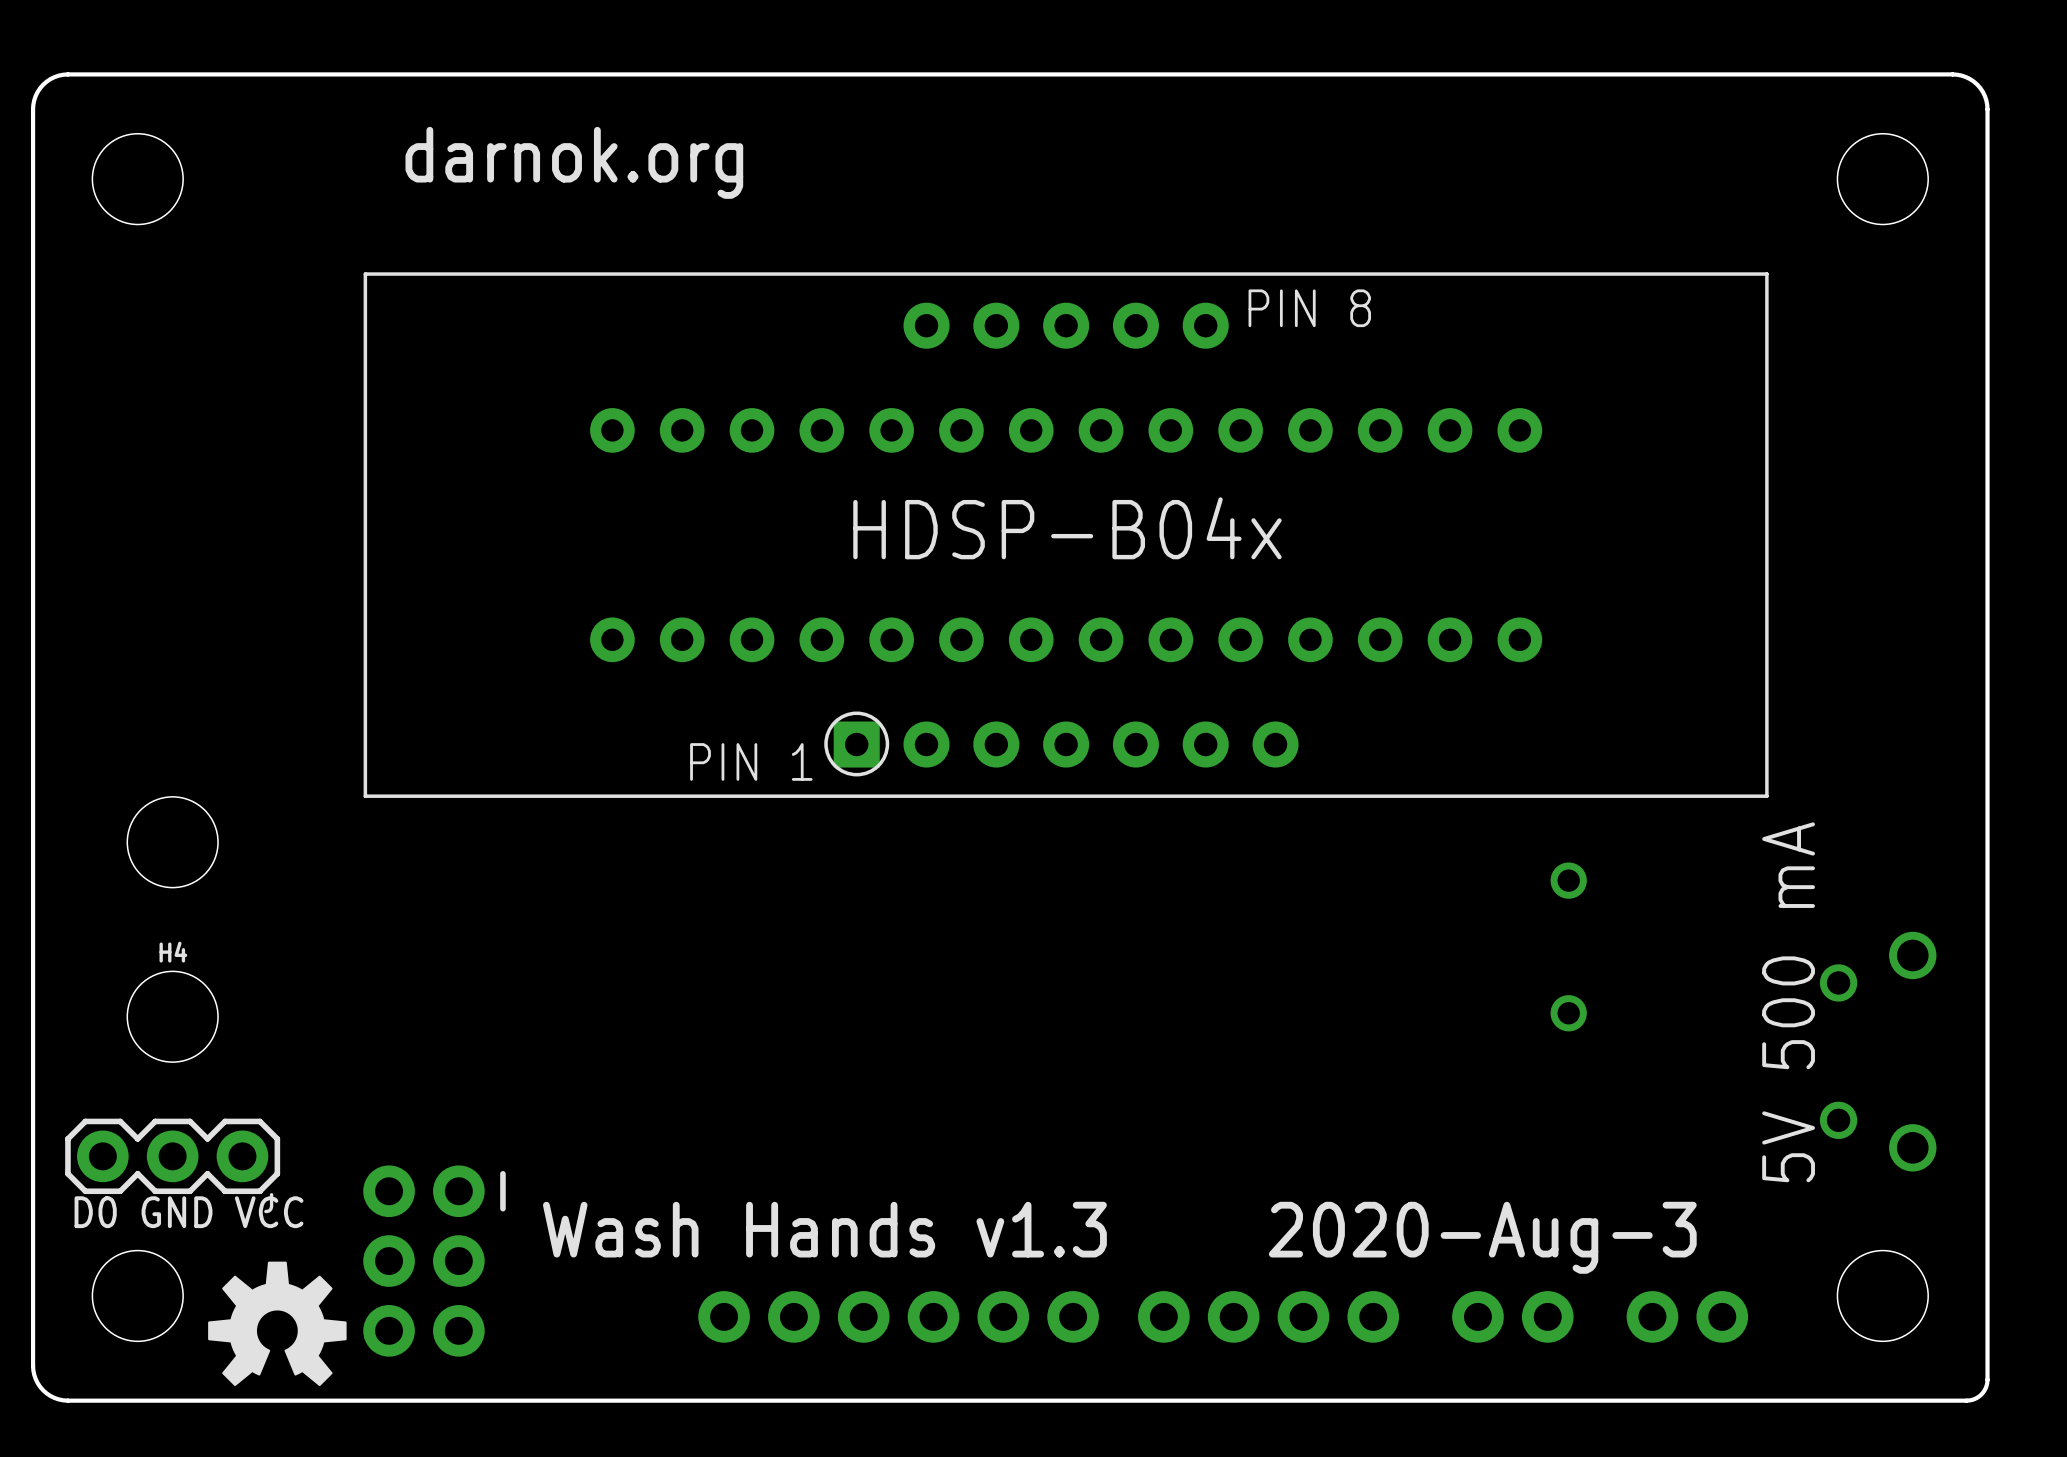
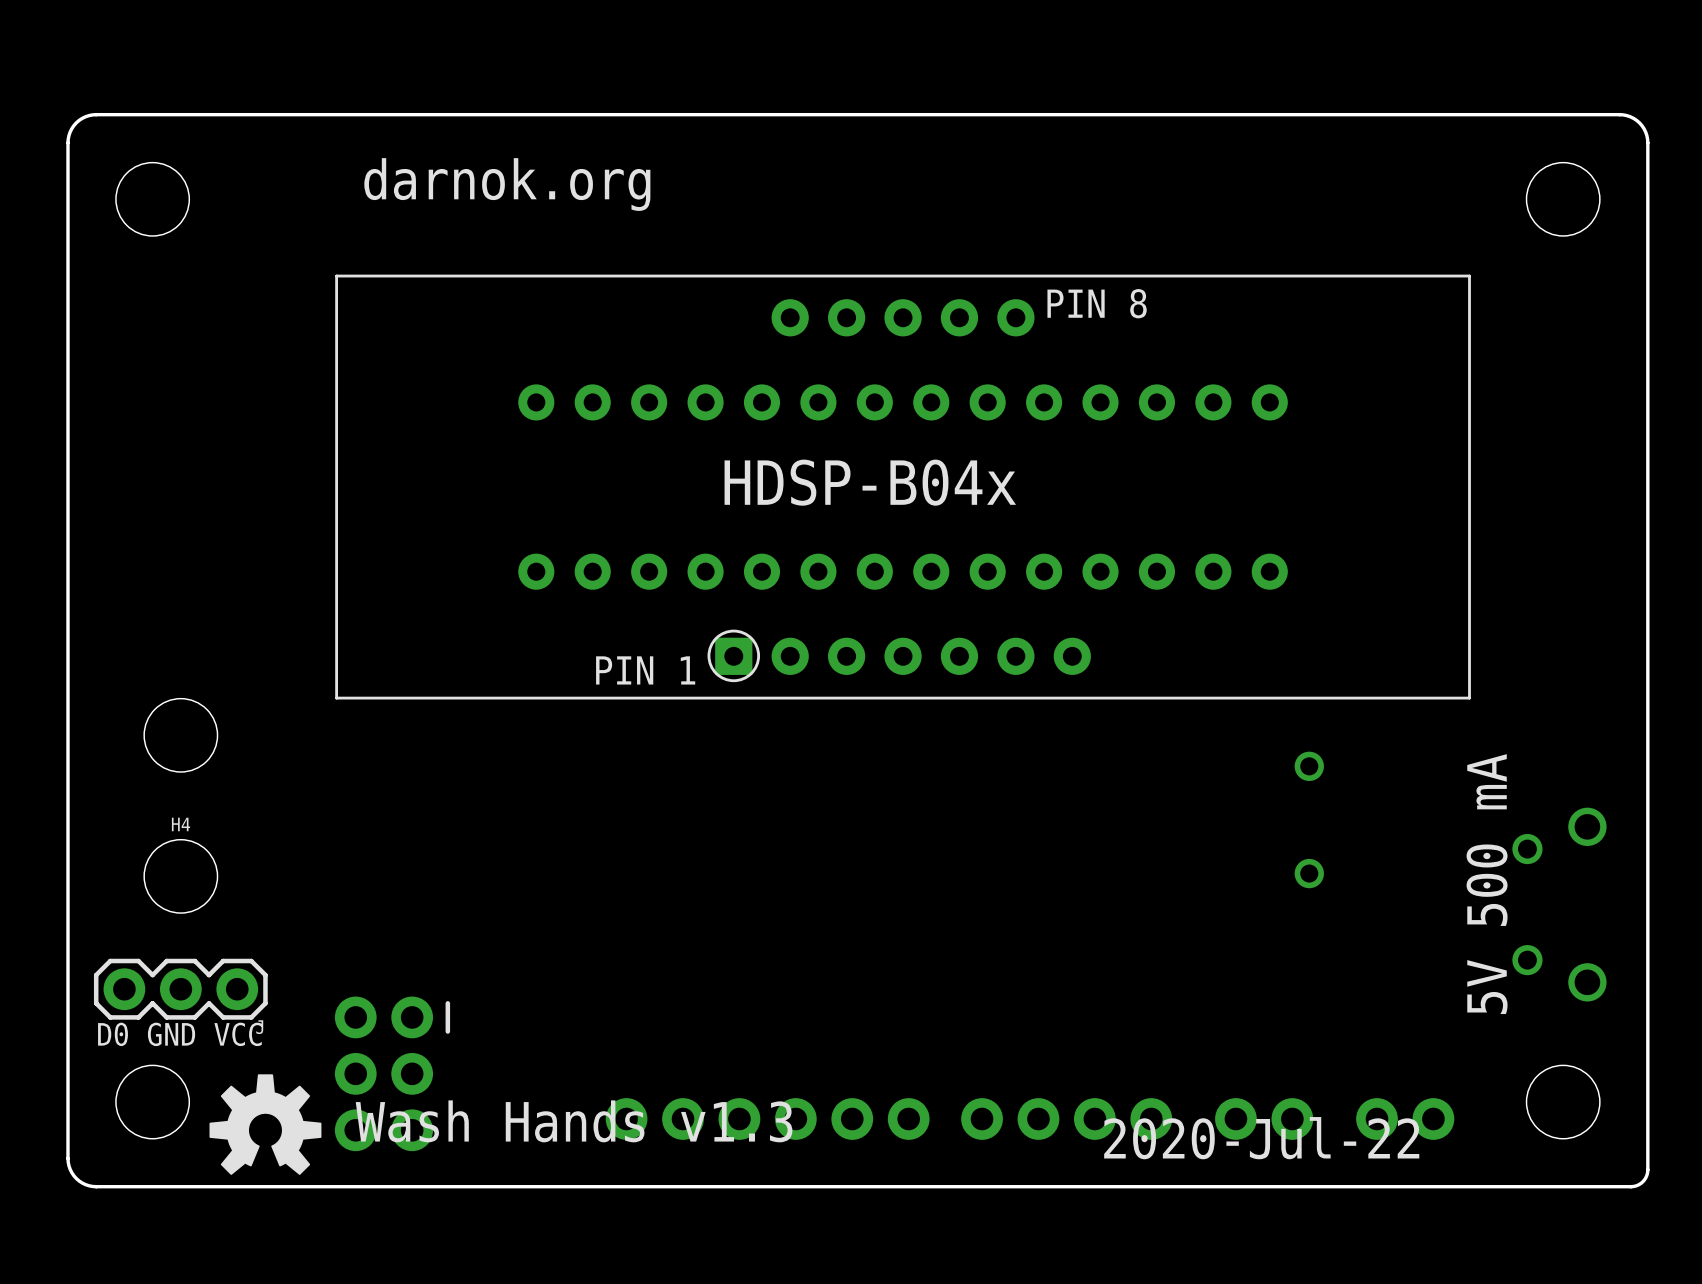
text position: Wash Hands v1.3 (824, 1229) -> Wash Hands v1.3 (574, 1121)
text: 2020-Aug-3 (1482, 1237) -> none
text: none -> 2020-Jul-22 (1261, 1138)

